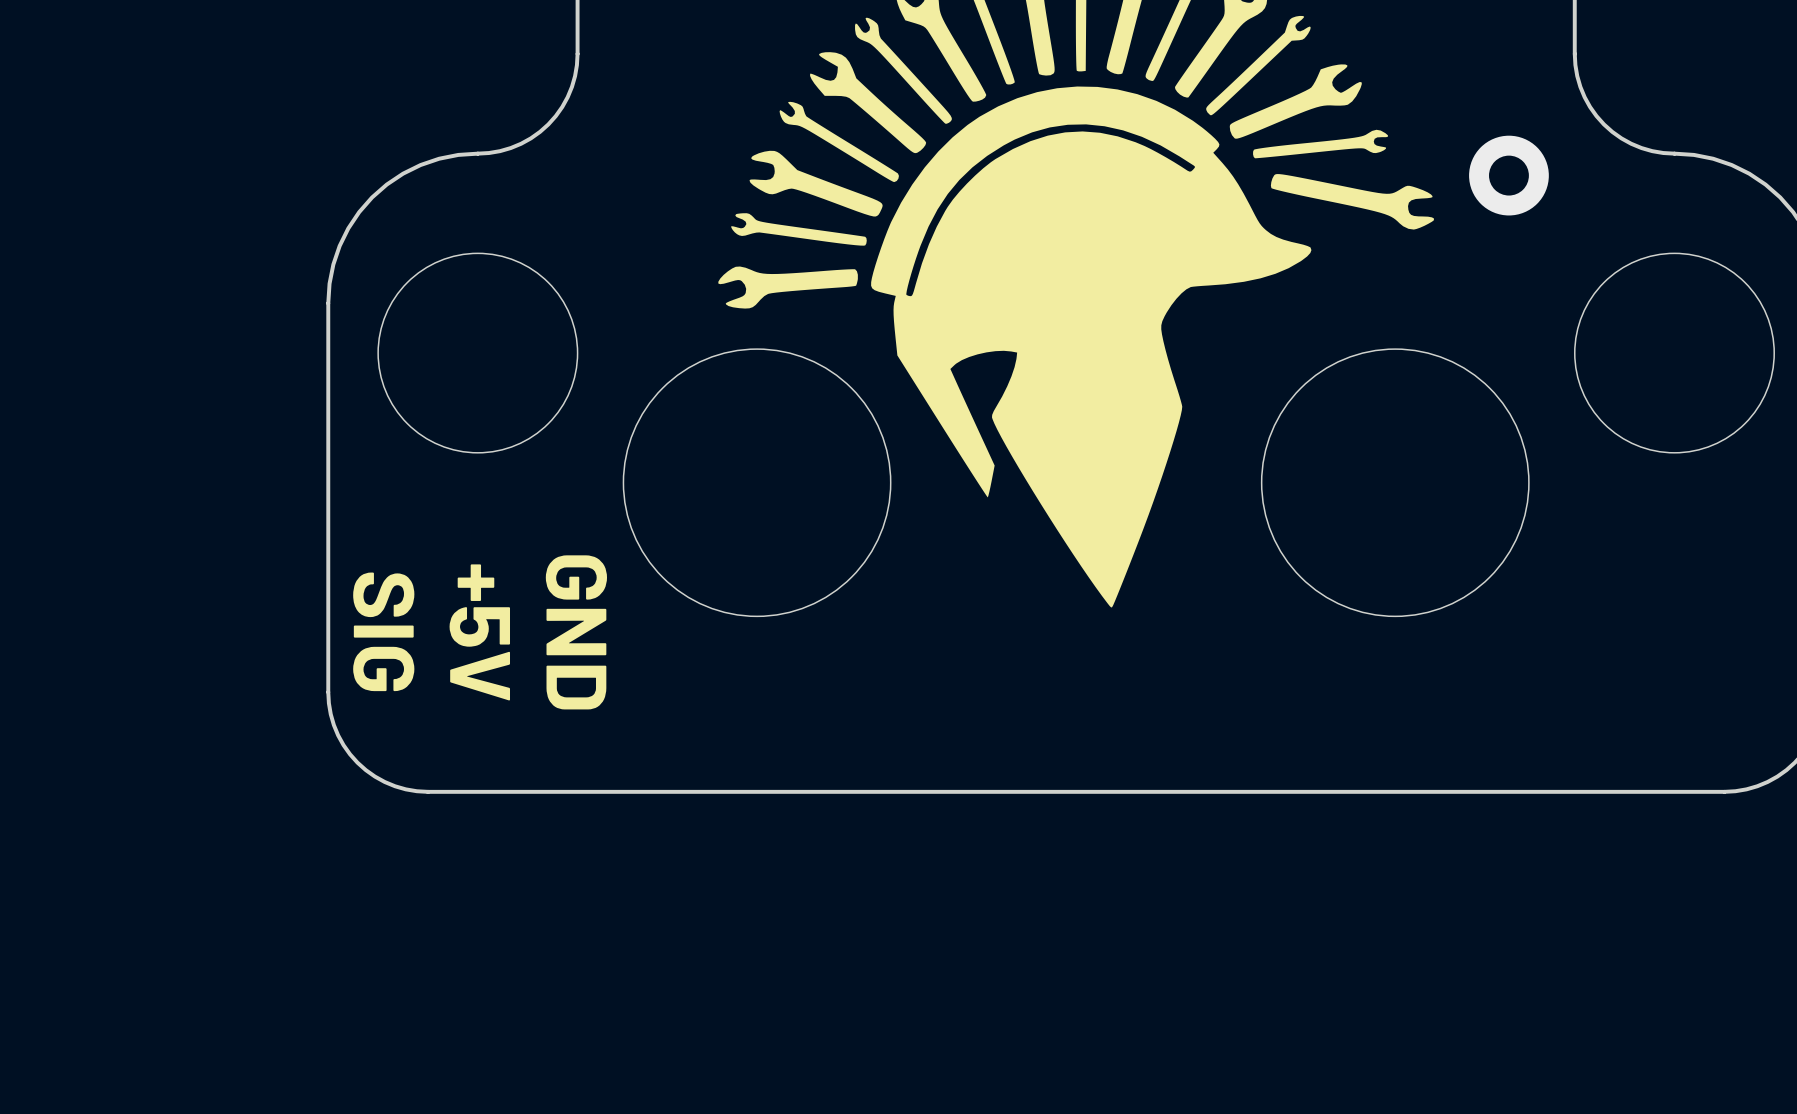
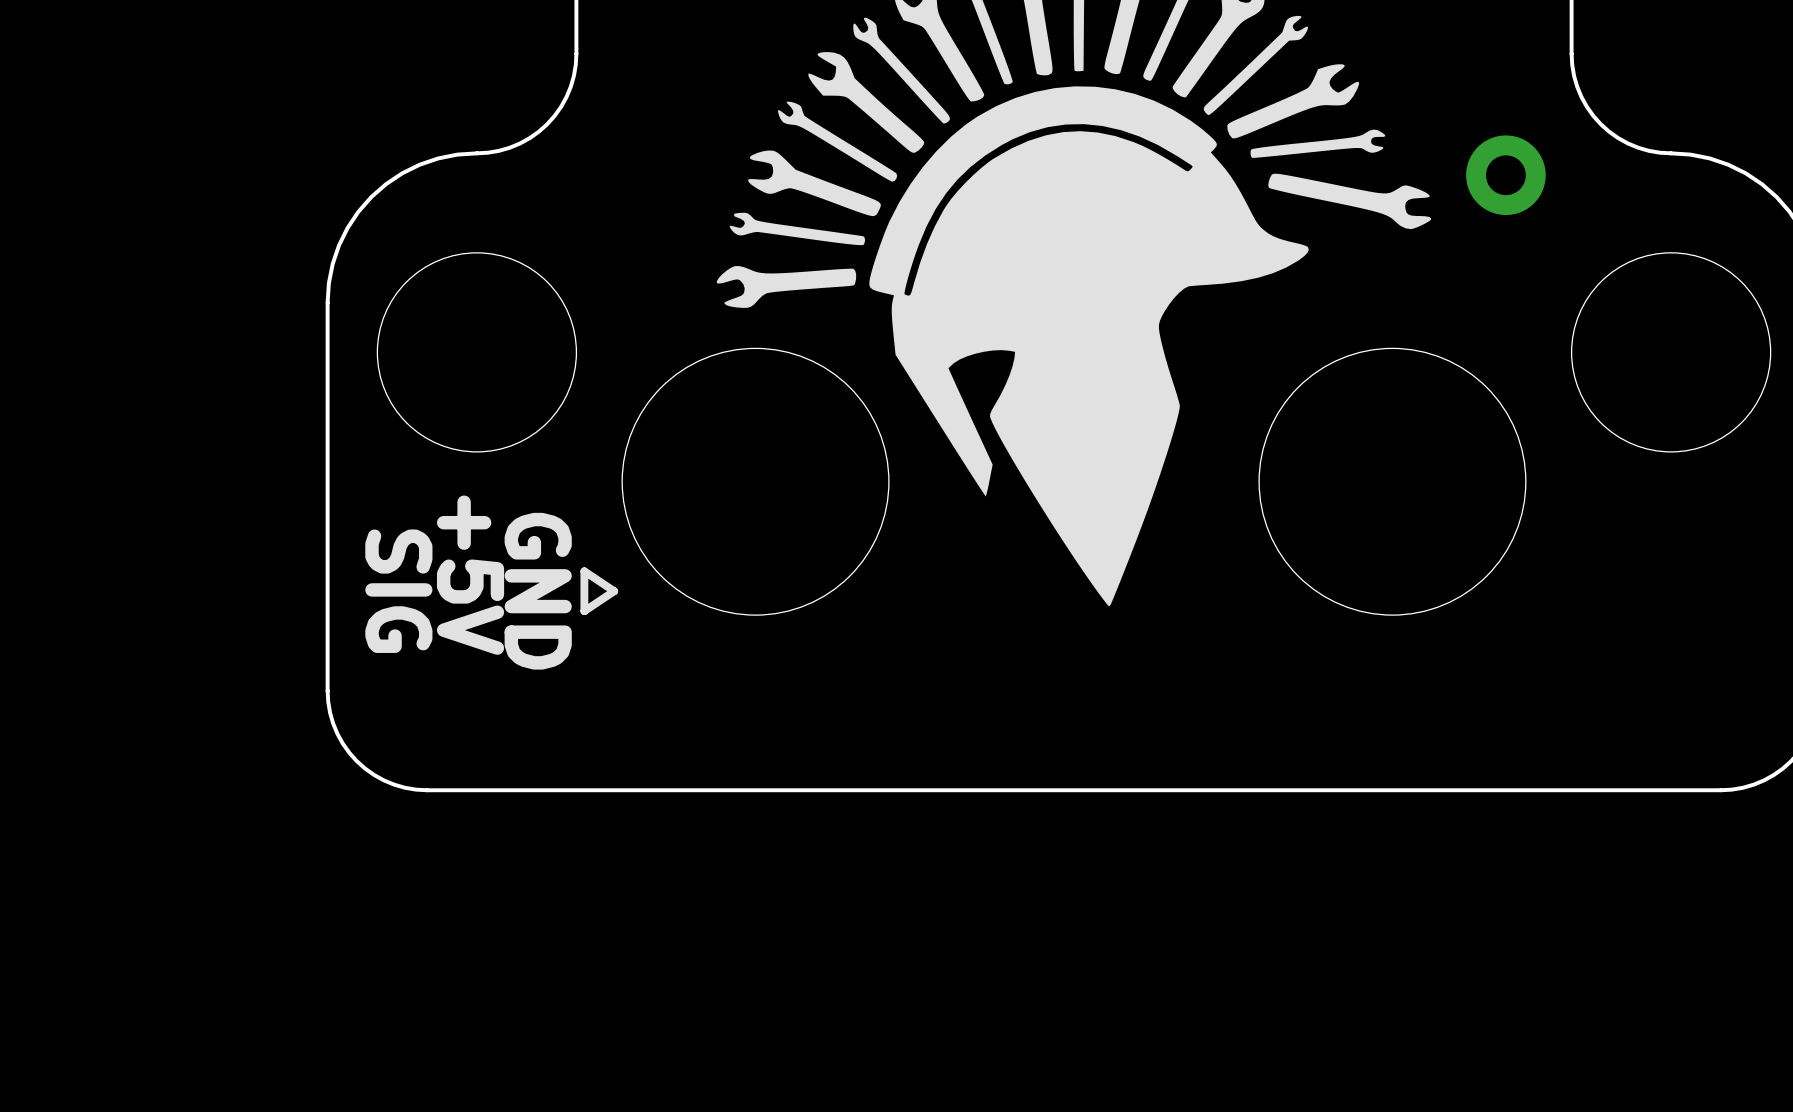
line: none -> (584, 571) (614, 591) (584, 611) (584, 571)
text position: SIG (383, 631) -> SIG (398, 591)
text position: +5V (479, 632) -> +5V (470, 575)
text position: GND (576, 632) -> GND (538, 591)

